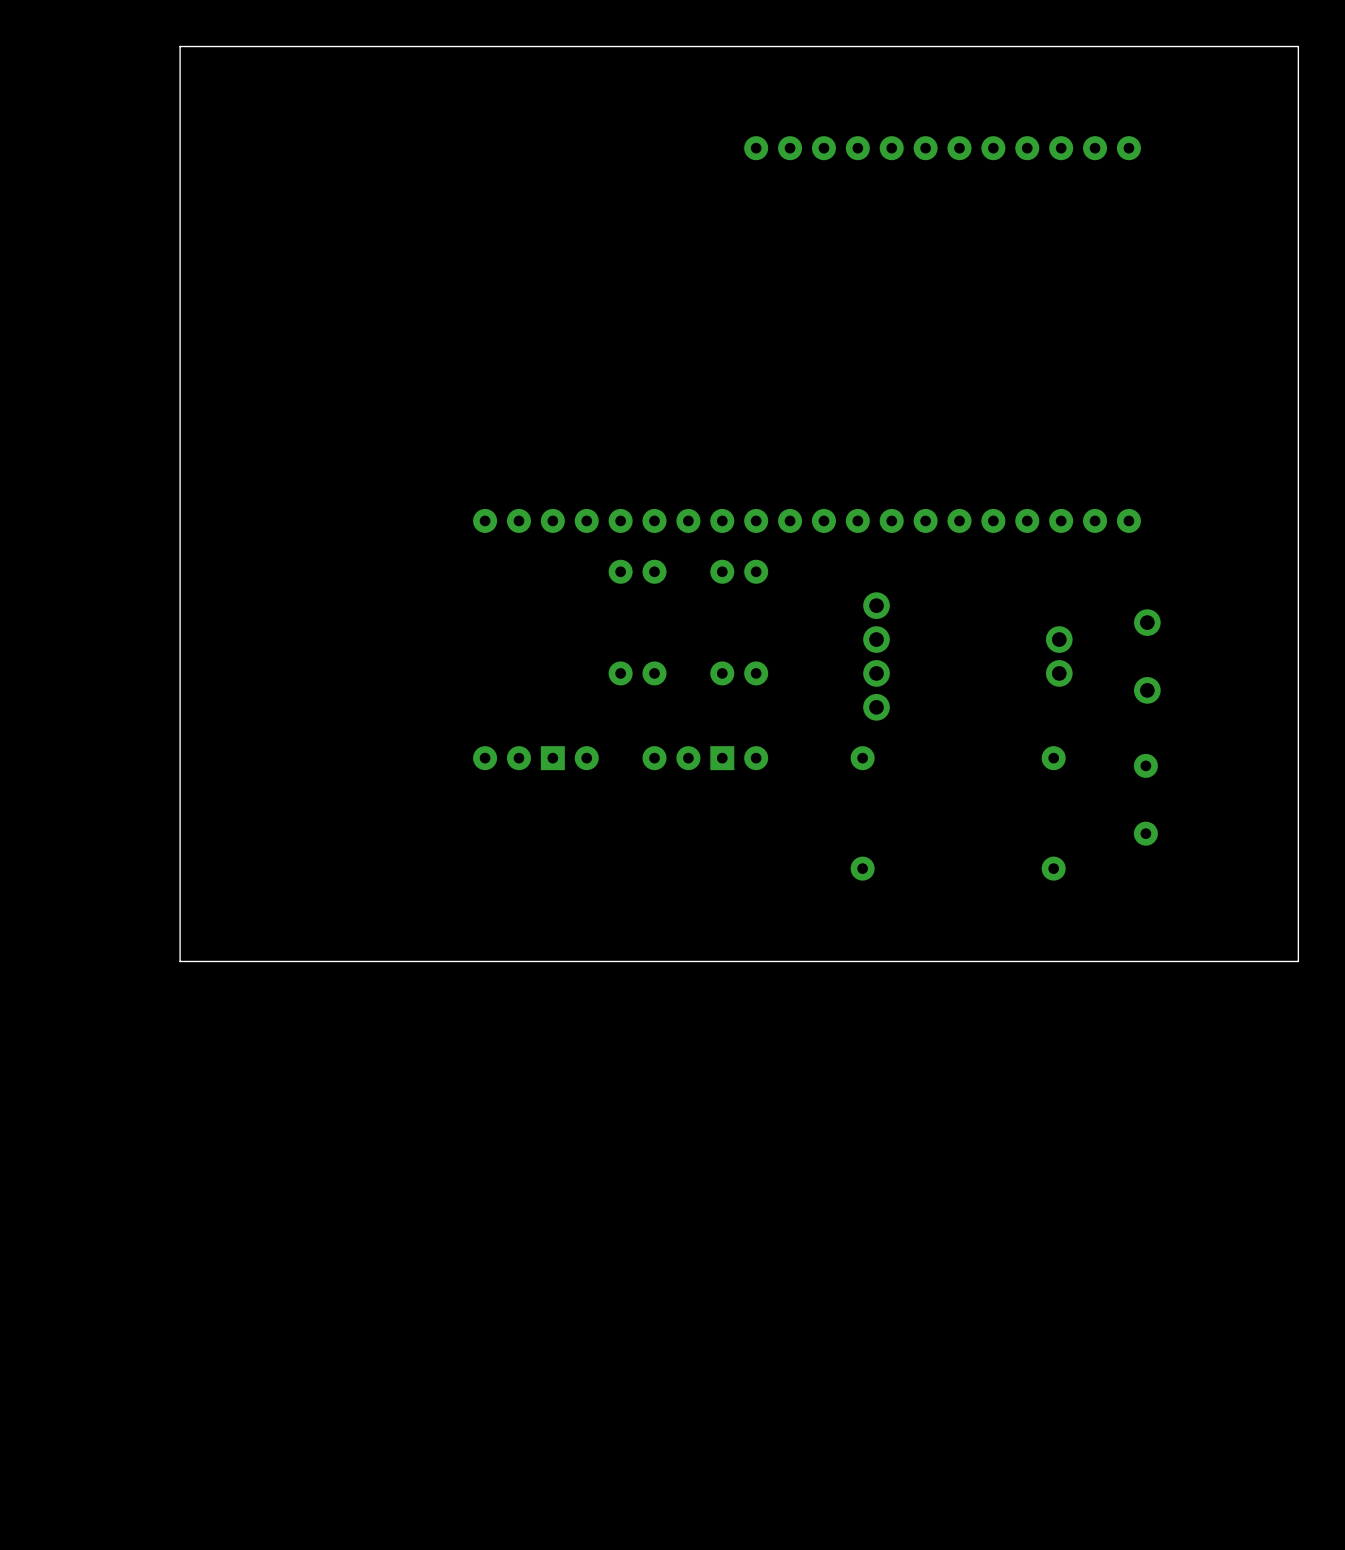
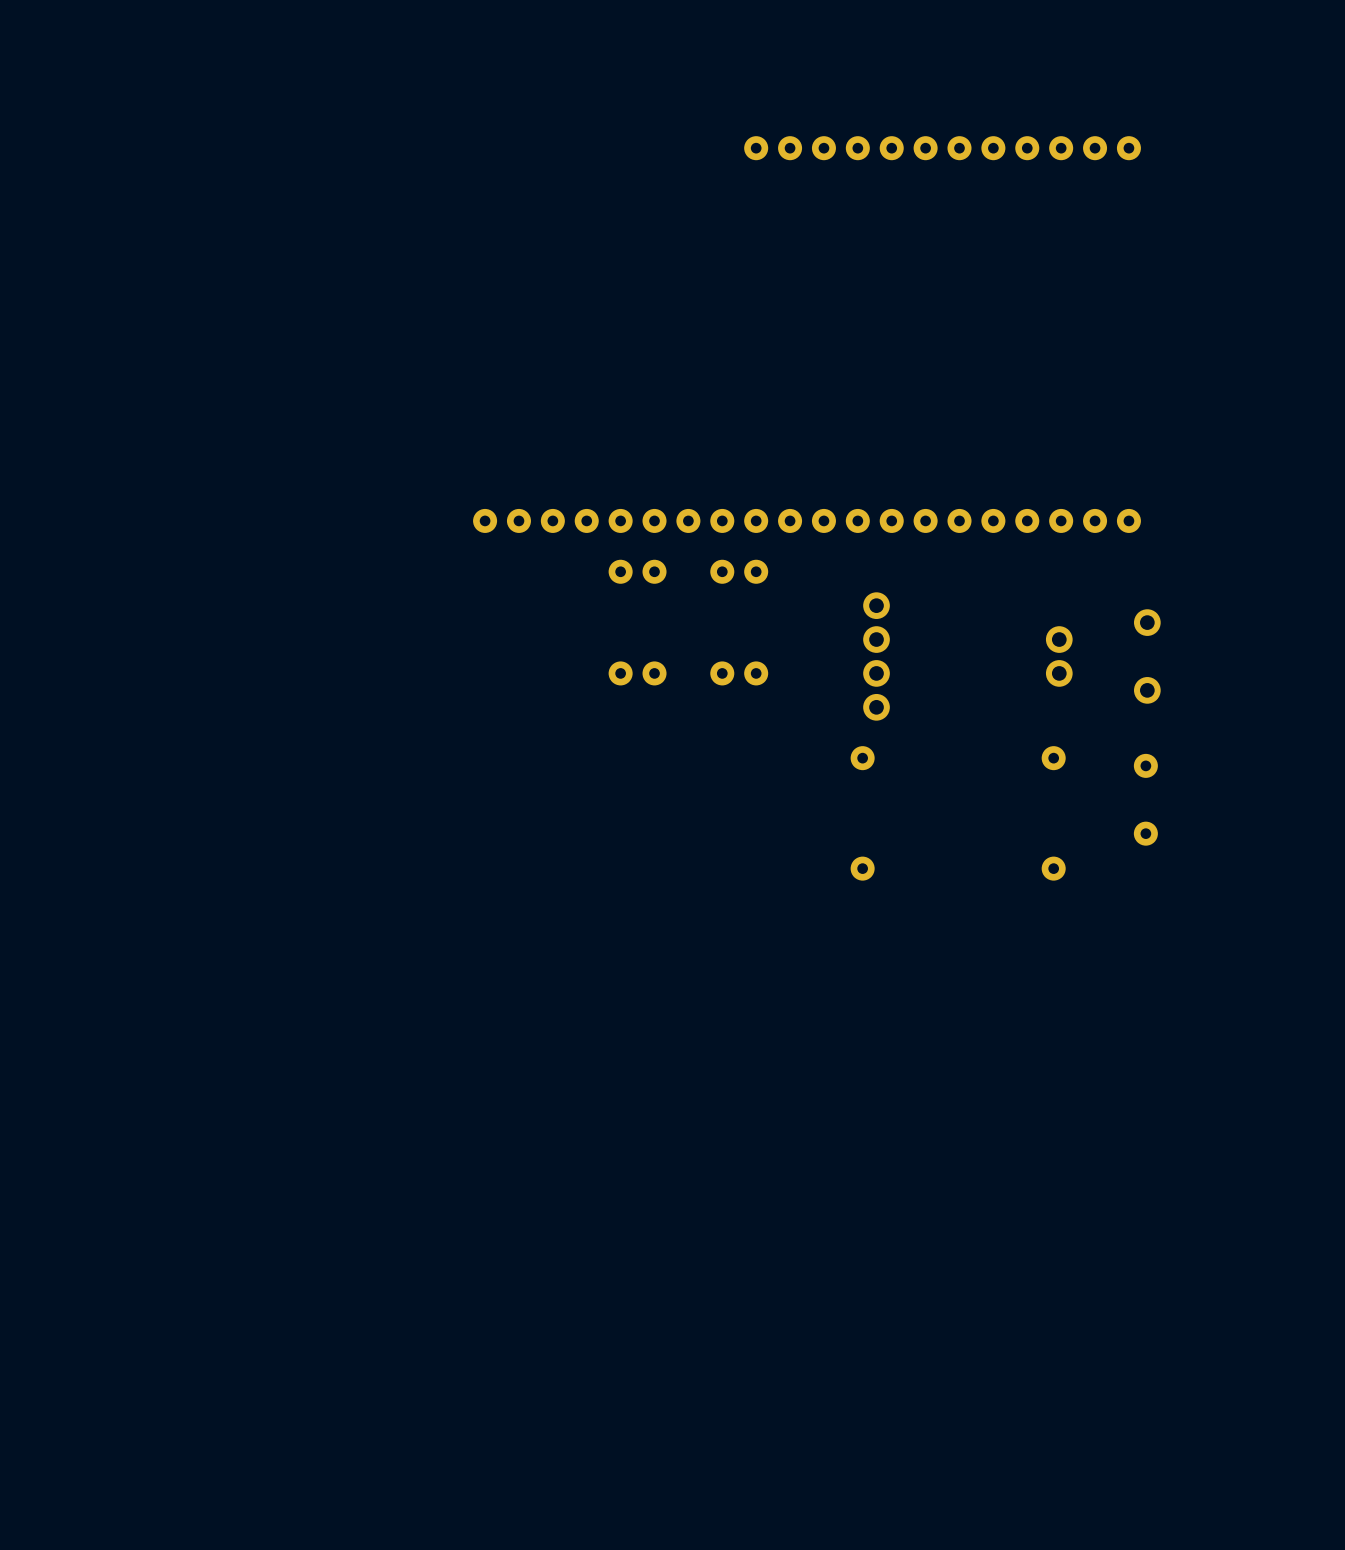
board edge: (1298, 46) (180, 46) (180, 961) (1298, 961) (1298, 46) -> none
part: (535, 758) -> none
part: (705, 758) -> none

